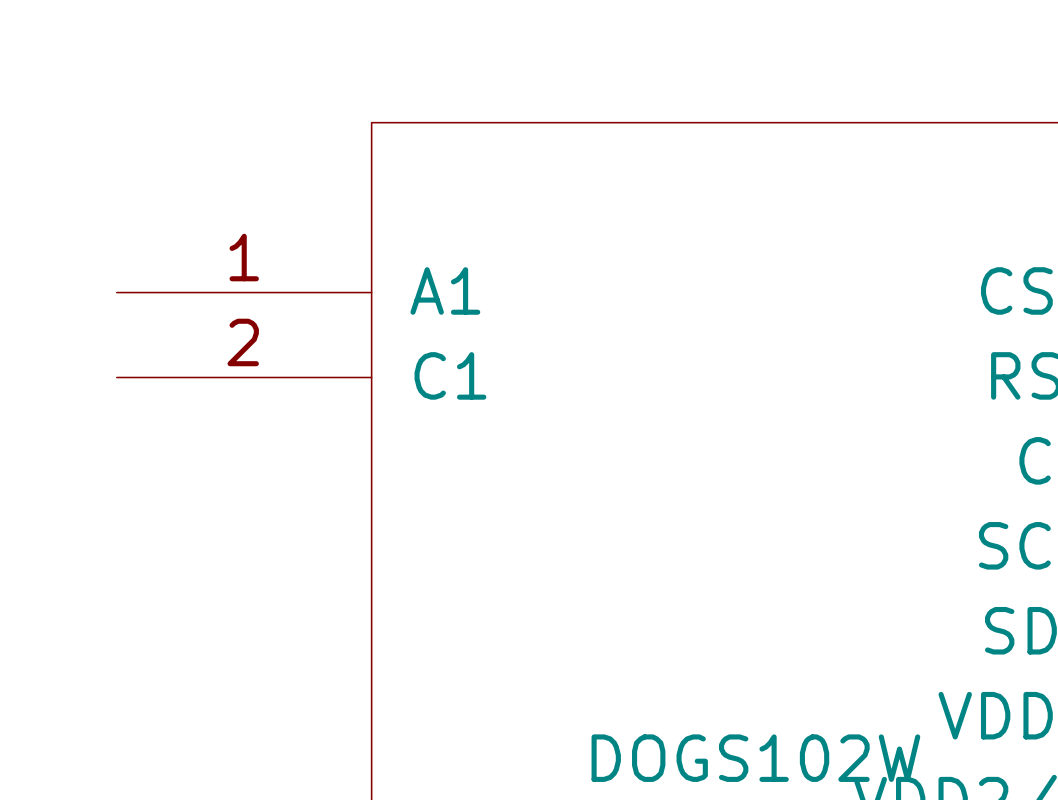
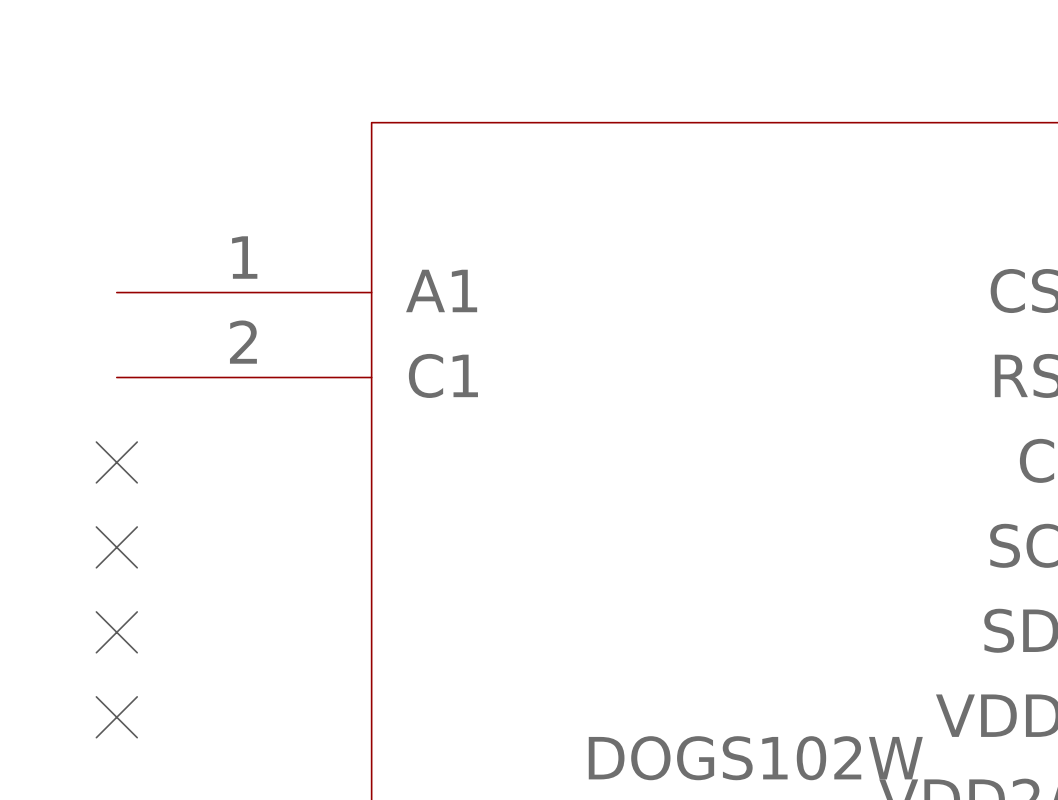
no-connect mark: none -> (116, 462)
no-connect mark: none -> (116, 547)
no-connect mark: none -> (116, 632)
no-connect mark: none -> (116, 717)

